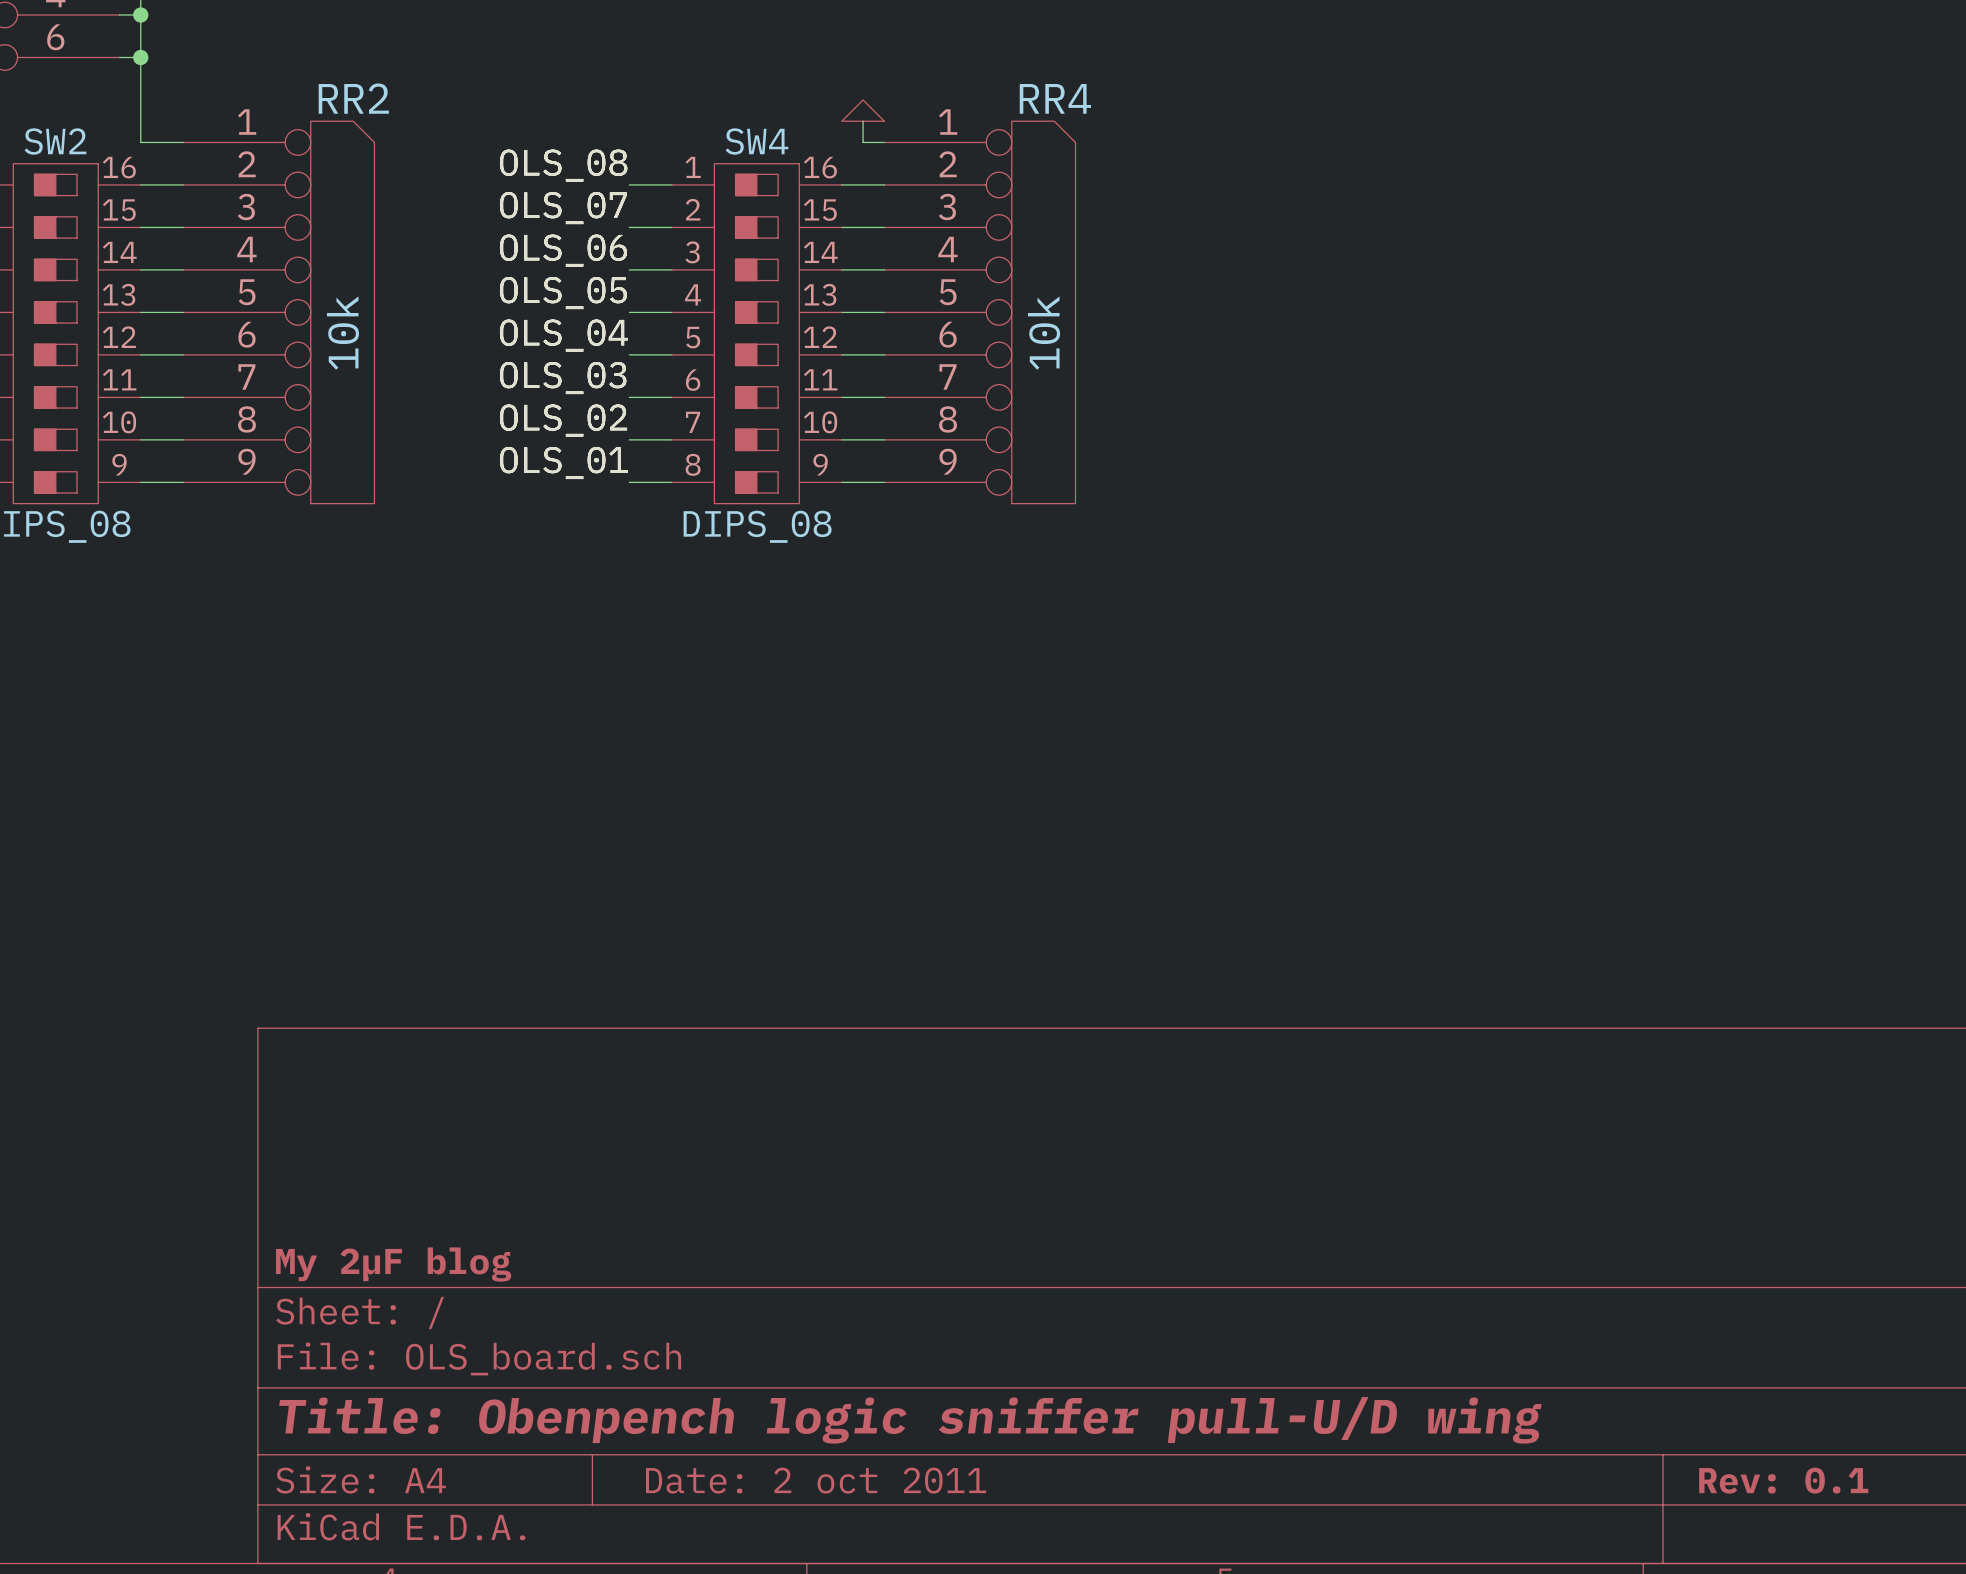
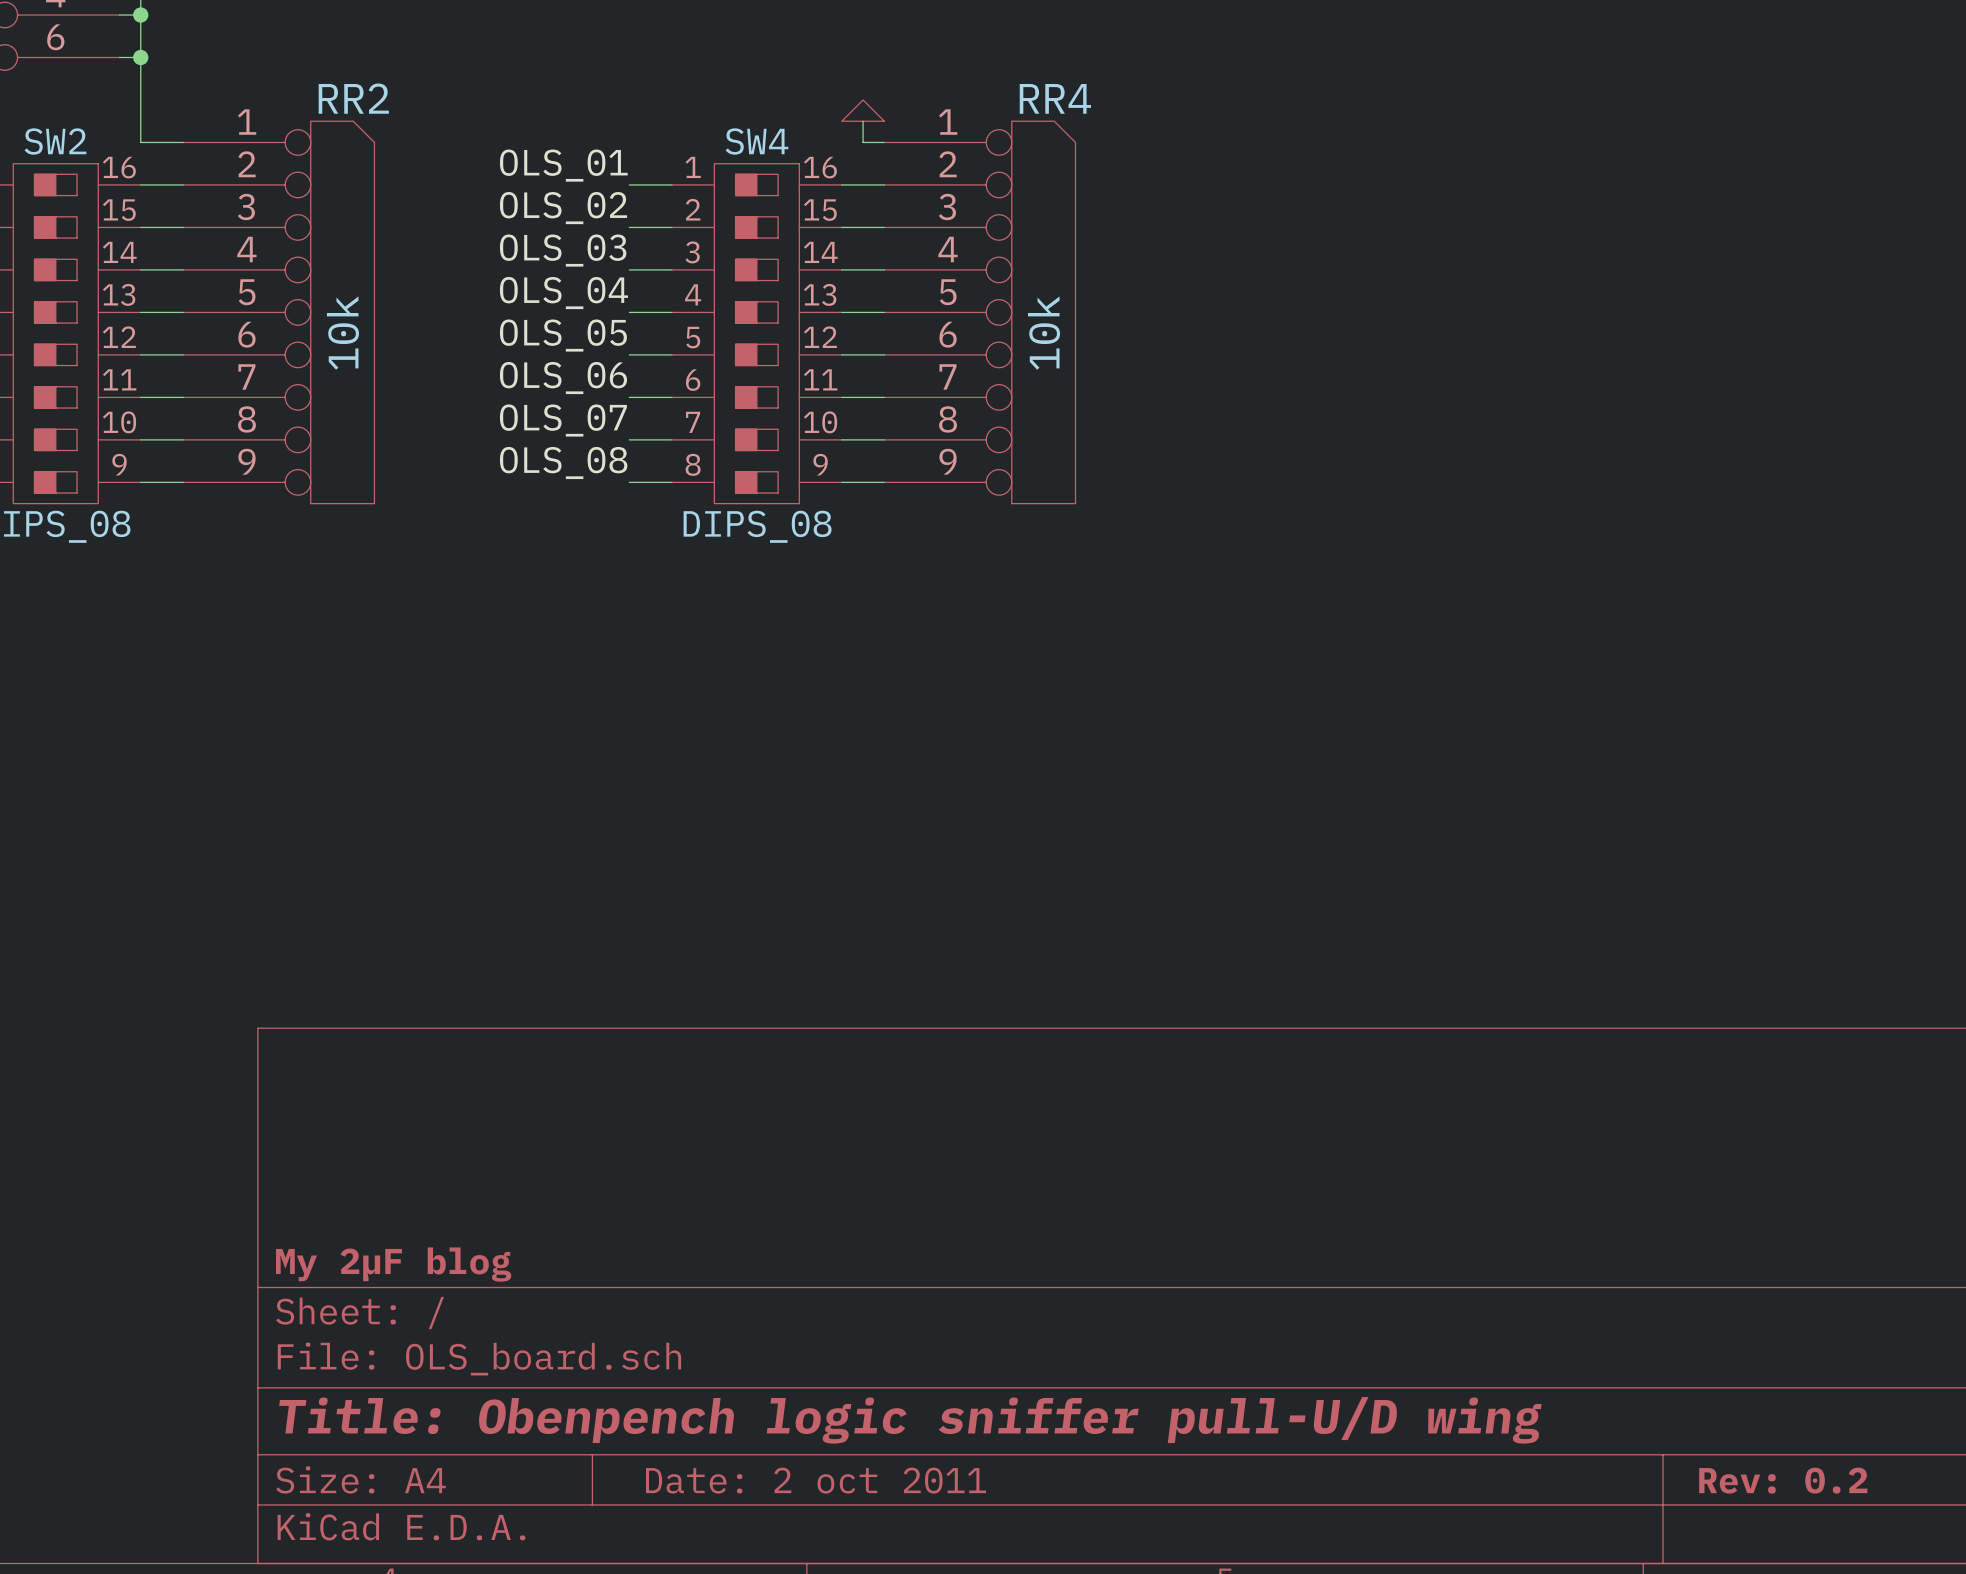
label: OLS_08 (563, 165) -> OLS_01 (563, 165)
label: OLS_07 (563, 208) -> OLS_02 (563, 208)
label: OLS_06 (563, 250) -> OLS_03 (563, 250)
label: OLS_05 (563, 293) -> OLS_04 (563, 293)
label: OLS_04 (563, 335) -> OLS_05 (563, 335)
label: OLS_03 (563, 378) -> OLS_06 (563, 378)
label: OLS_02 (563, 420) -> OLS_07 (563, 420)
label: OLS_01 (563, 463) -> OLS_08 (563, 463)
title block: Rev: 0.1 (1783, 1480) -> Rev: 0.2 (1783, 1480)

